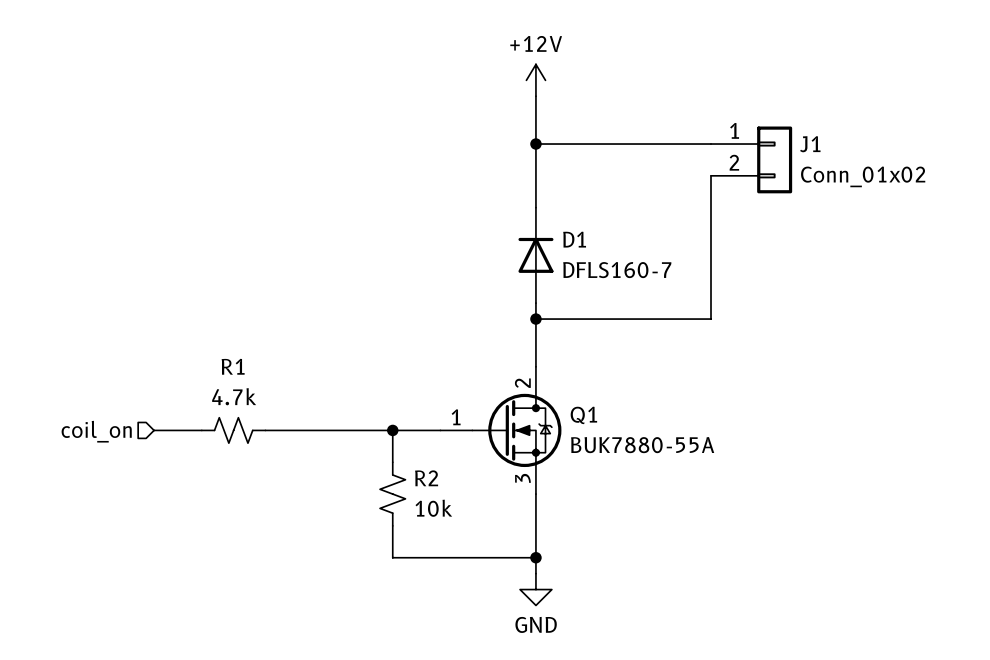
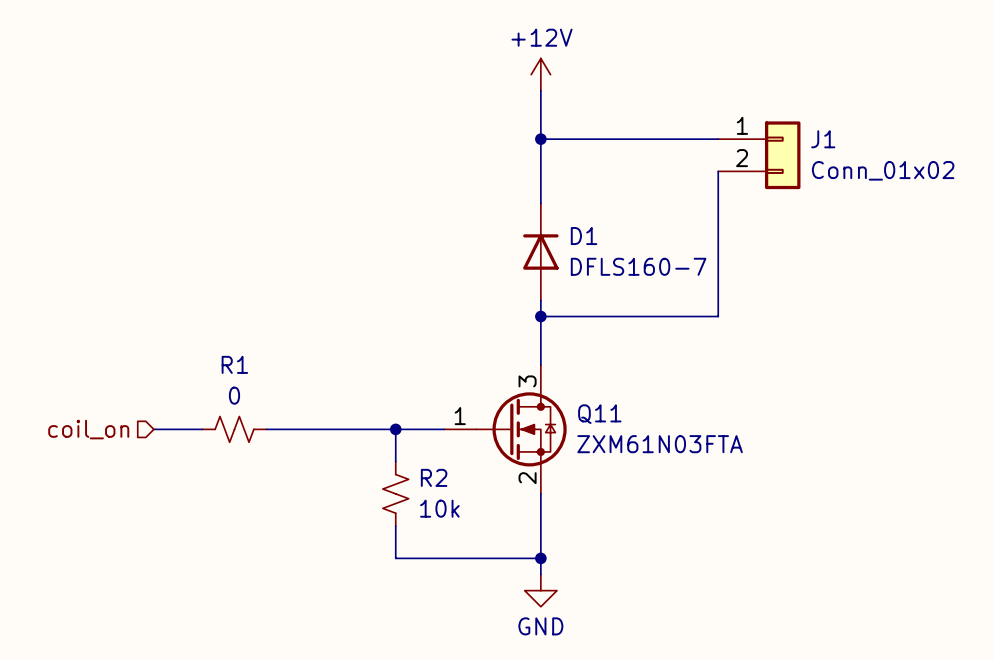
R1 value: 4.7k (234, 396) -> 0 (234, 395)
Q1: BUK7880-55A (500, 430) -> none
Q11: none -> ZXM61N03FTA (505, 429)

